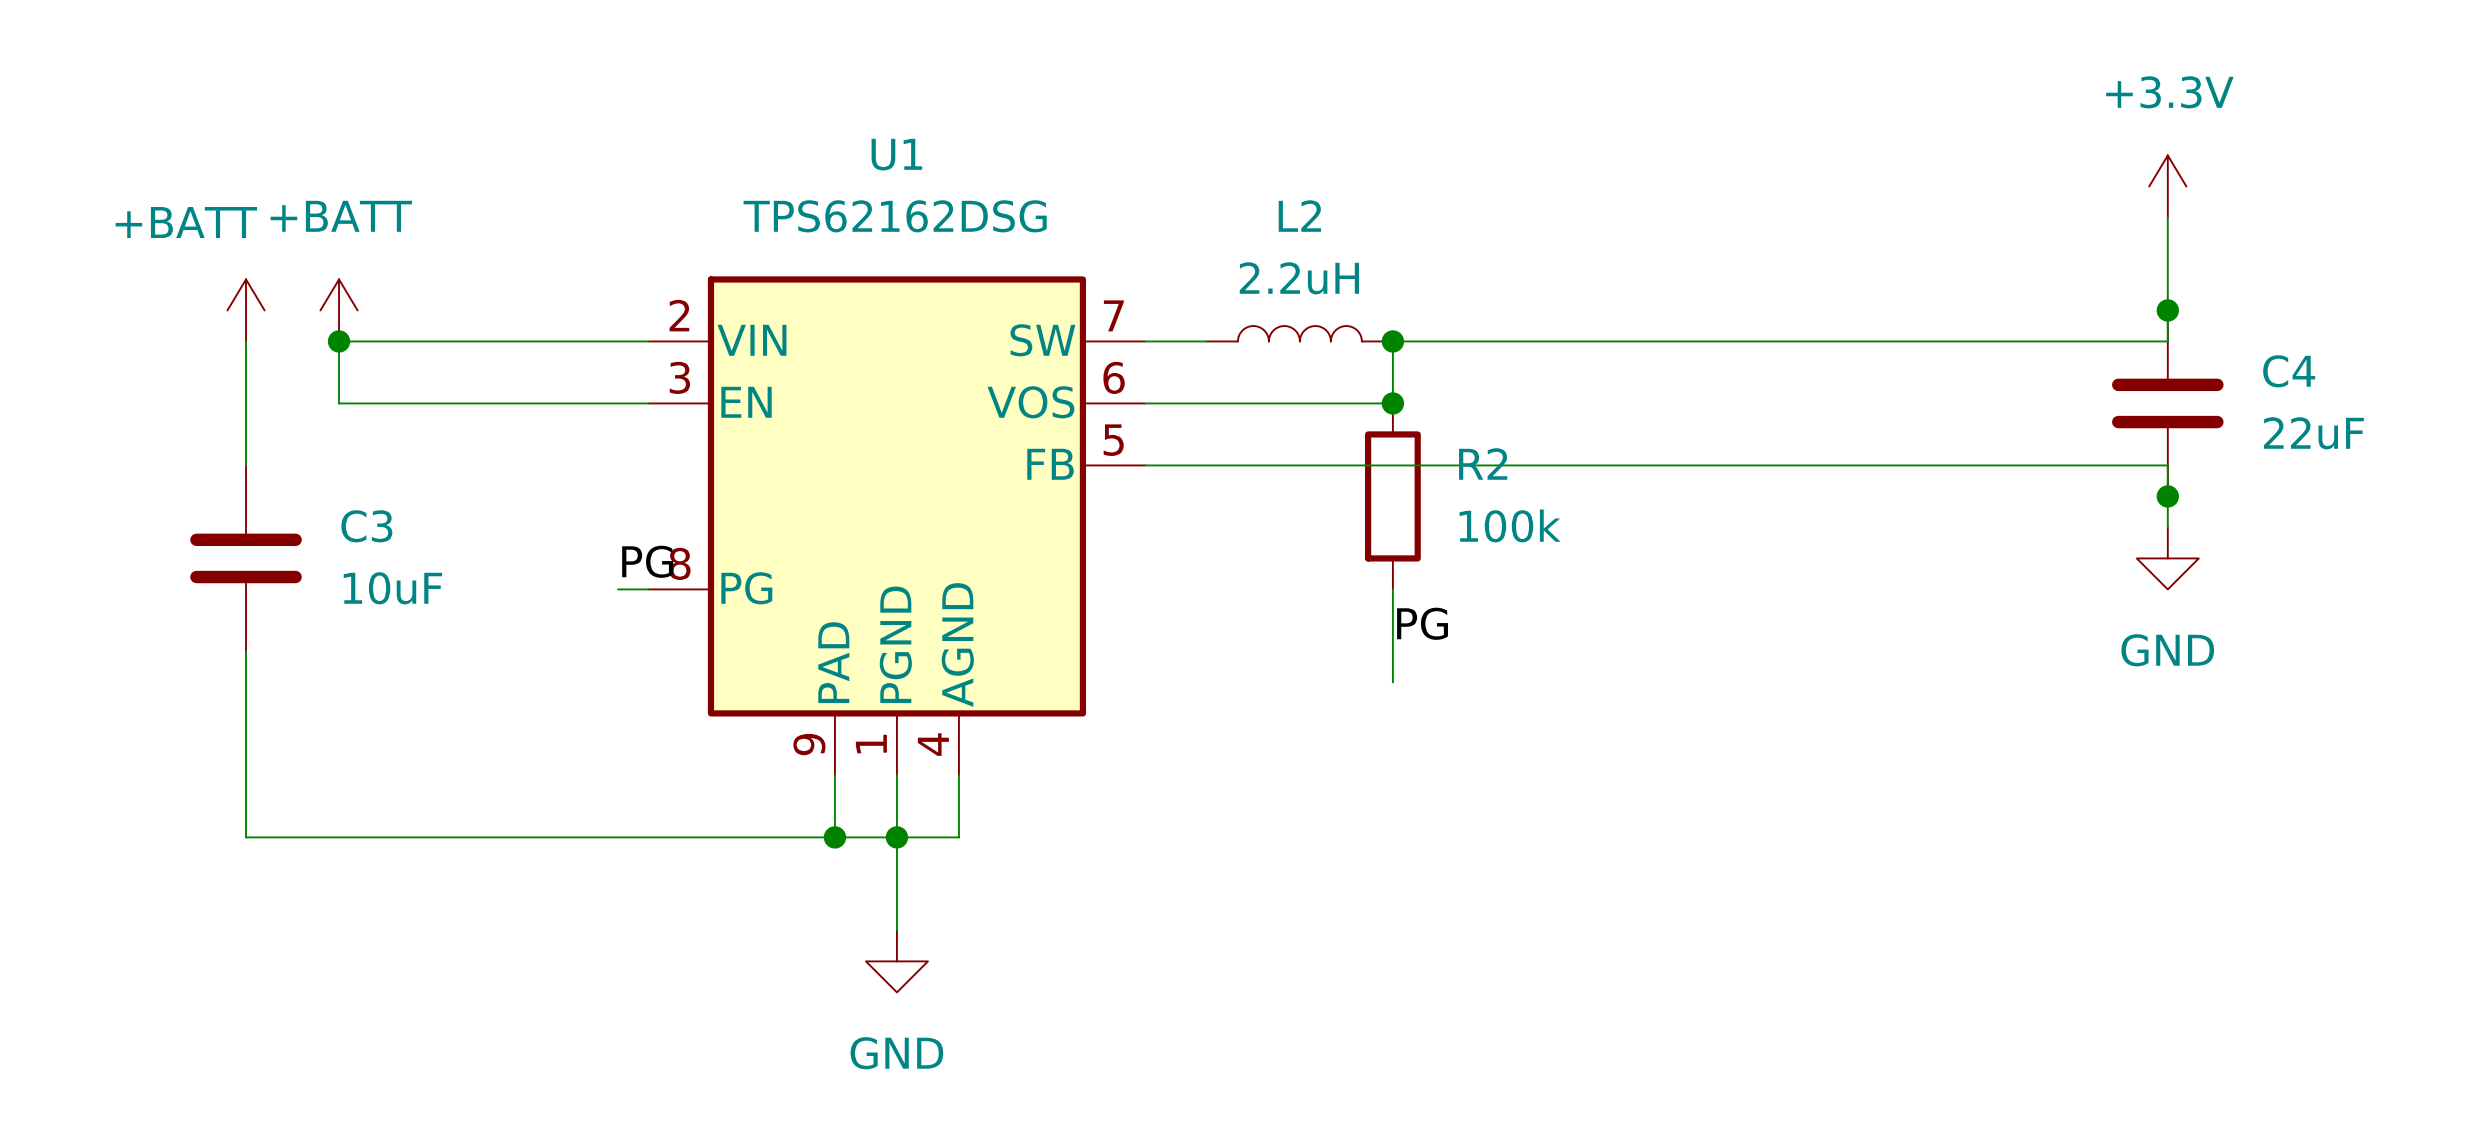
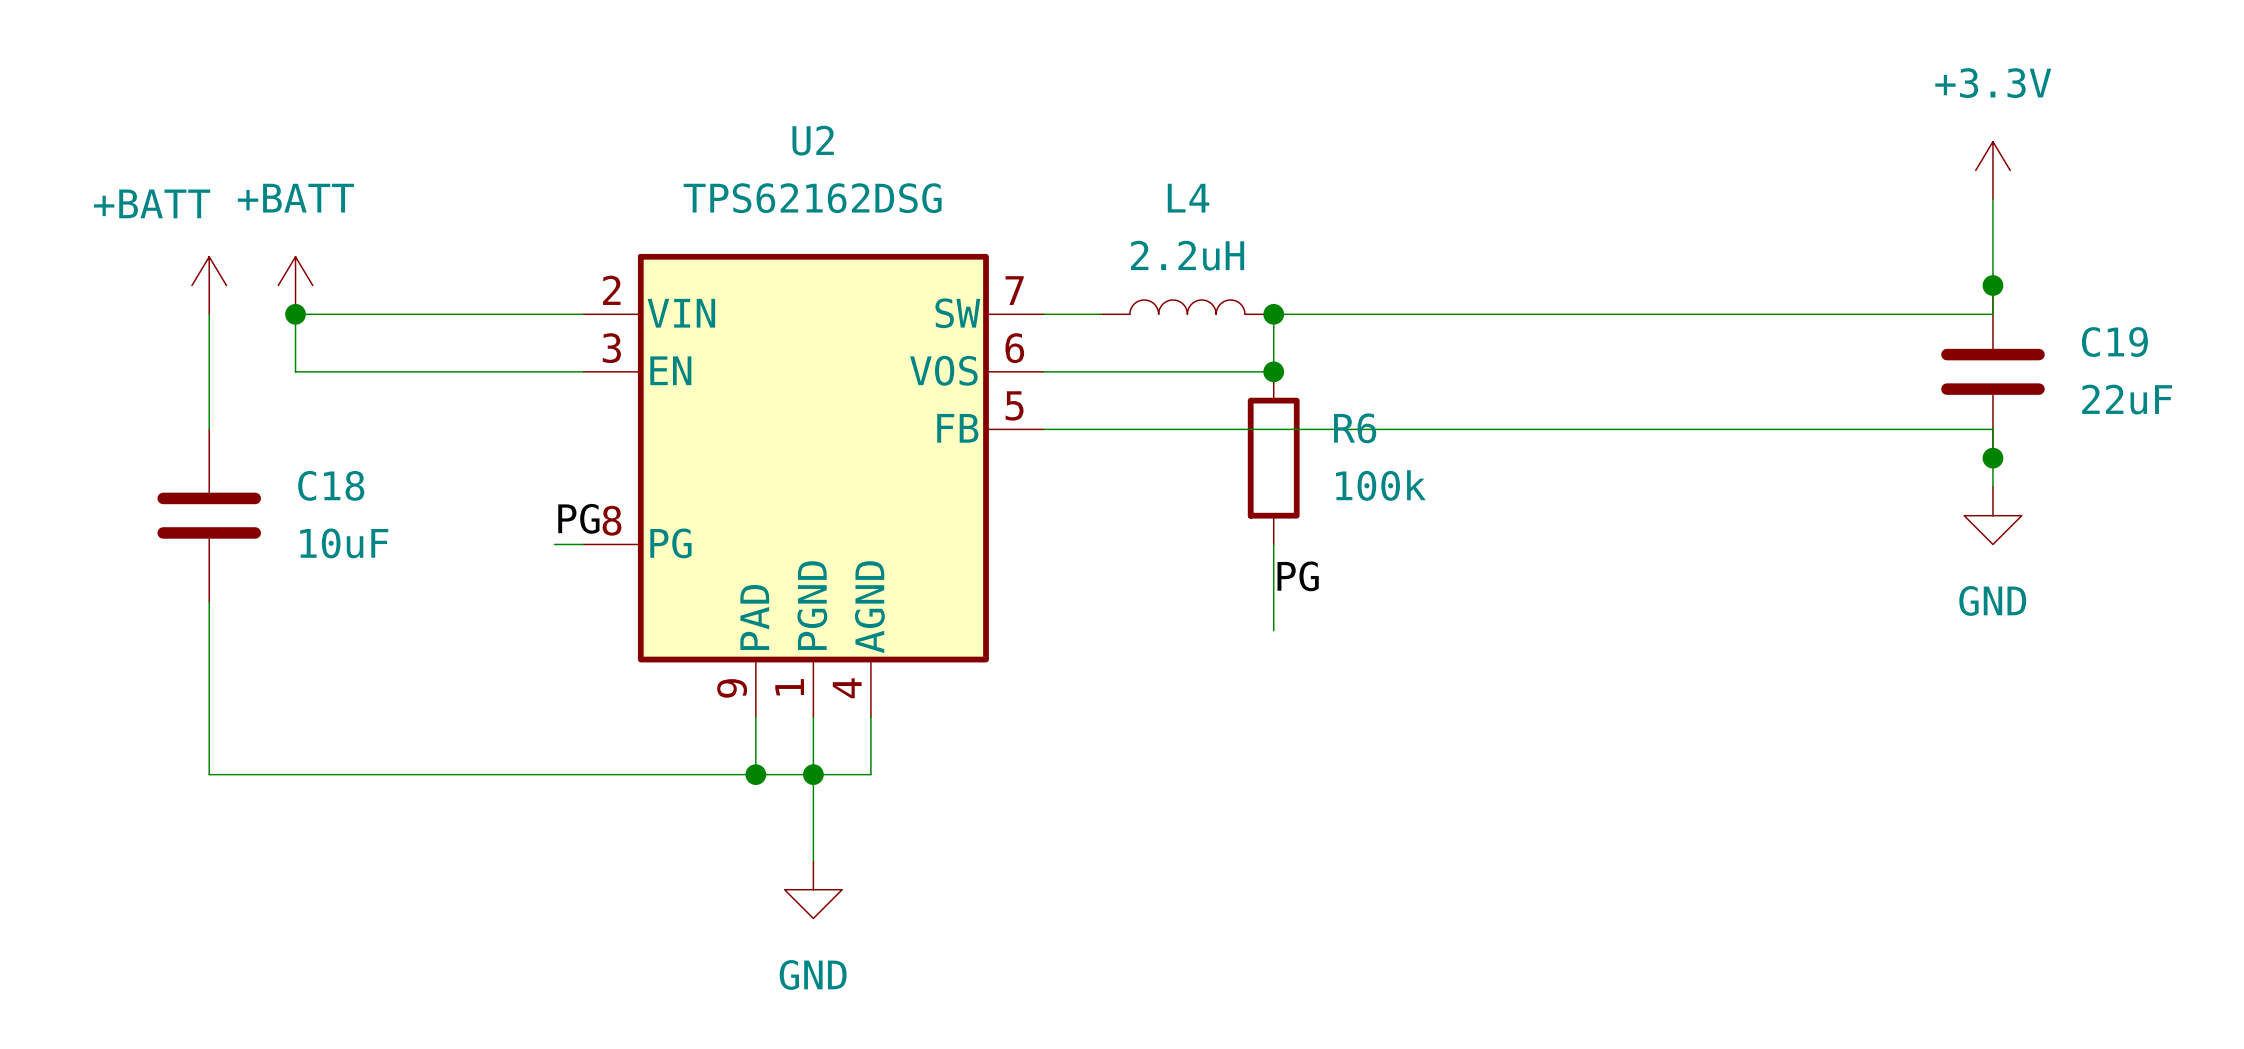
U1 name: U1 (896, 154) -> U2 (813, 140)
L2 name: L2 (1299, 216) -> L4 (1188, 198)
C4 name: C4 (2289, 371) -> C19 (2114, 342)
R2 name: R2 (1483, 464) -> R6 (1355, 428)
C3 name: C3 (366, 526) -> C18 (331, 485)

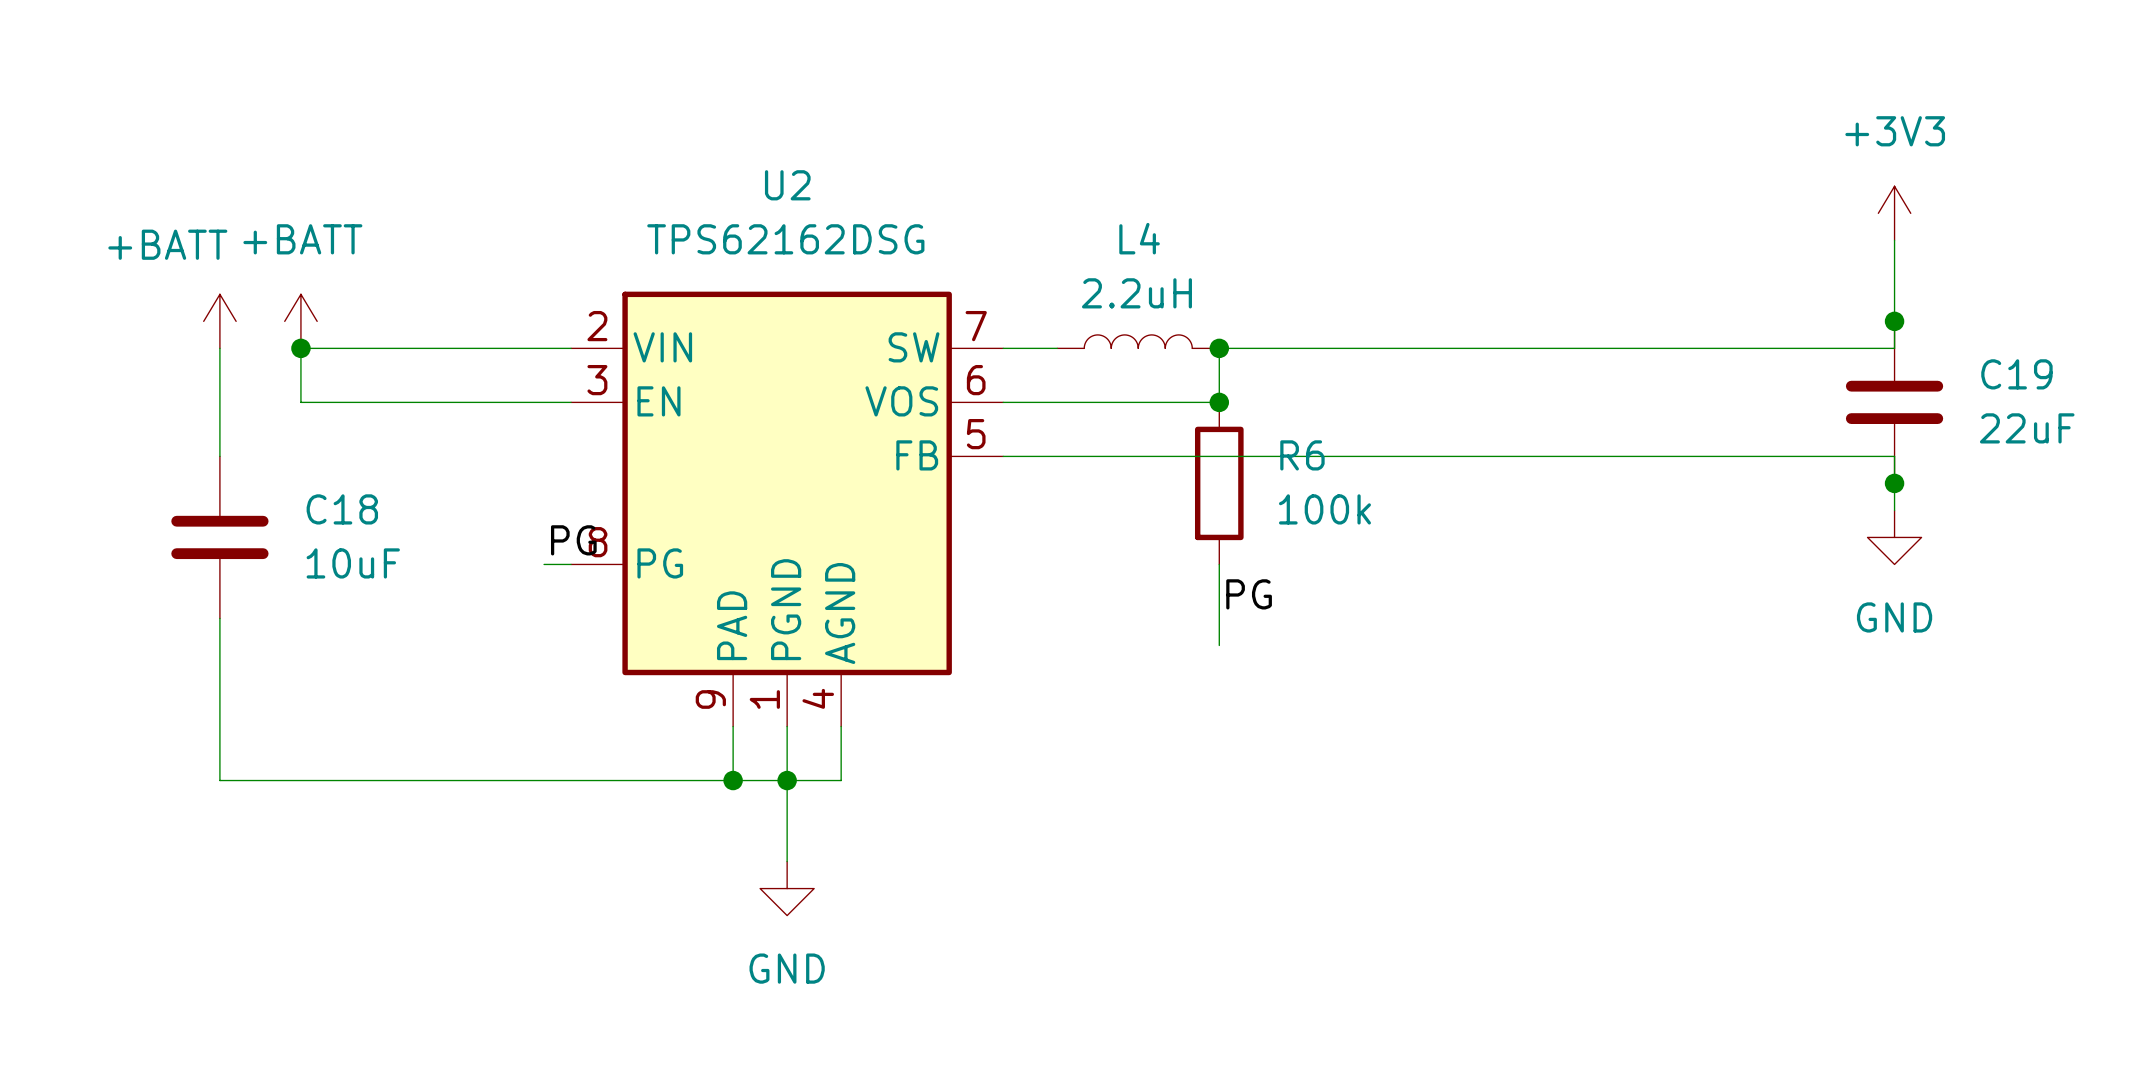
power symbol: +3.3V (1992, 170) -> +3V3 (1894, 213)

